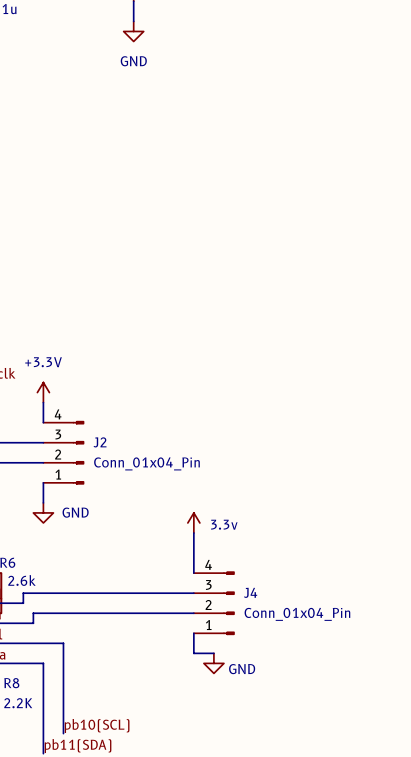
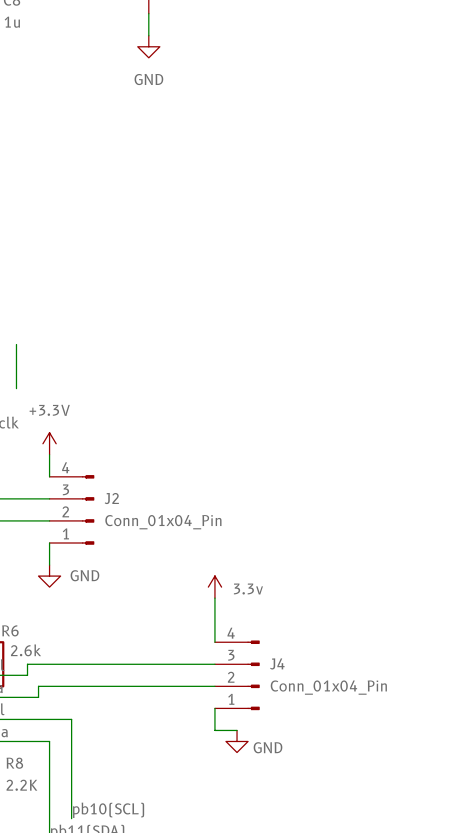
wire: none -> (16, 344) (16, 388)

